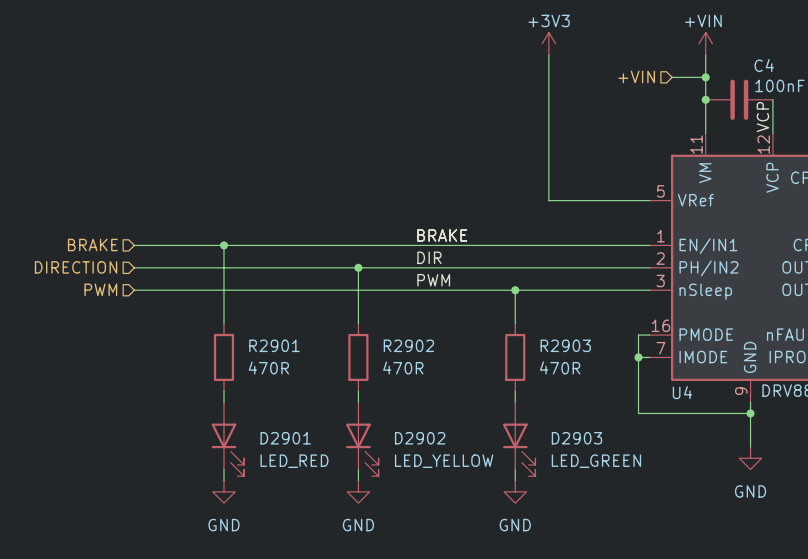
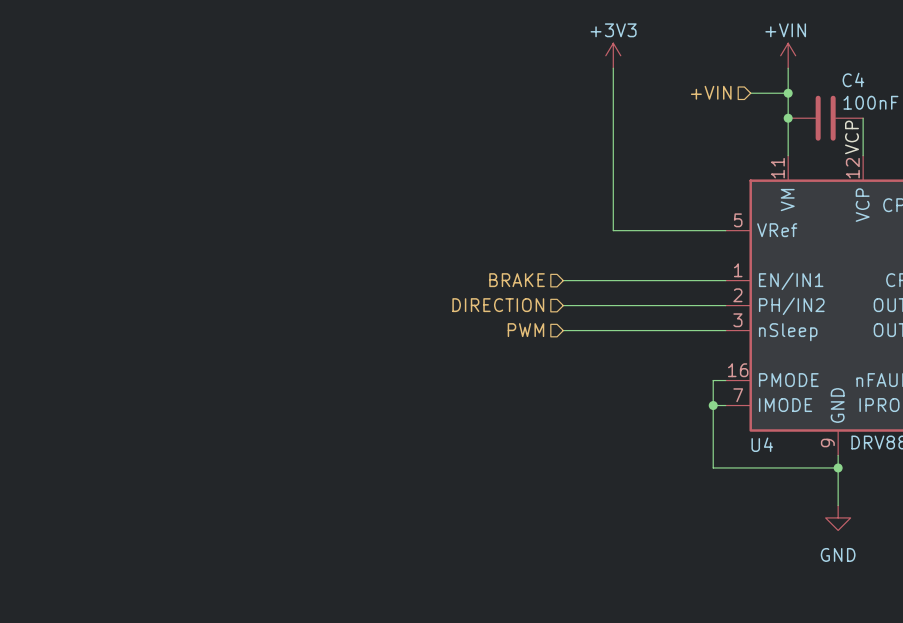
label: BRAKE (442, 235) -> none
hierarchical label: BRAKE (92, 245) -> none
wire: (134, 245) (504, 245) -> none
wire: (223, 245) (223, 323) -> none
junction: (223, 245) -> none
hierarchical label: none -> BRAKE (517, 280)
label: DIR (429, 257) -> none
hierarchical label: DIRECTION (76, 267) -> none
wire: (134, 267) (504, 267) -> none
wire: (358, 267) (358, 323) -> none
junction: (358, 267) -> none
hierarchical label: none -> DIRECTION (498, 305)
label: PWM (433, 280) -> none
hierarchical label: PWM (100, 289) -> none
hierarchical label: none -> PWM (525, 330)
wire: (134, 290) (504, 290) -> none
wire: (515, 290) (515, 323) -> none
junction: (515, 290) -> none
R2901: 470R (223, 357) -> none
R2902: 470R (358, 357) -> none
R2903: 470R (515, 357) -> none
wire: (223, 391) (223, 402) -> none
wire: (358, 391) (358, 402) -> none
wire: (515, 391) (515, 402) -> none
D2901: LED_RED (227, 439) -> none
D2902: LED_YELLOW (362, 439) -> none
D2903: LED_GREEN (519, 439) -> none
wire: (223, 469) (223, 480) -> none
wire: (358, 469) (358, 480) -> none
wire: (515, 469) (515, 480) -> none
power symbol: GND (223, 491) -> none
power symbol: GND (358, 491) -> none
power symbol: GND (515, 491) -> none

